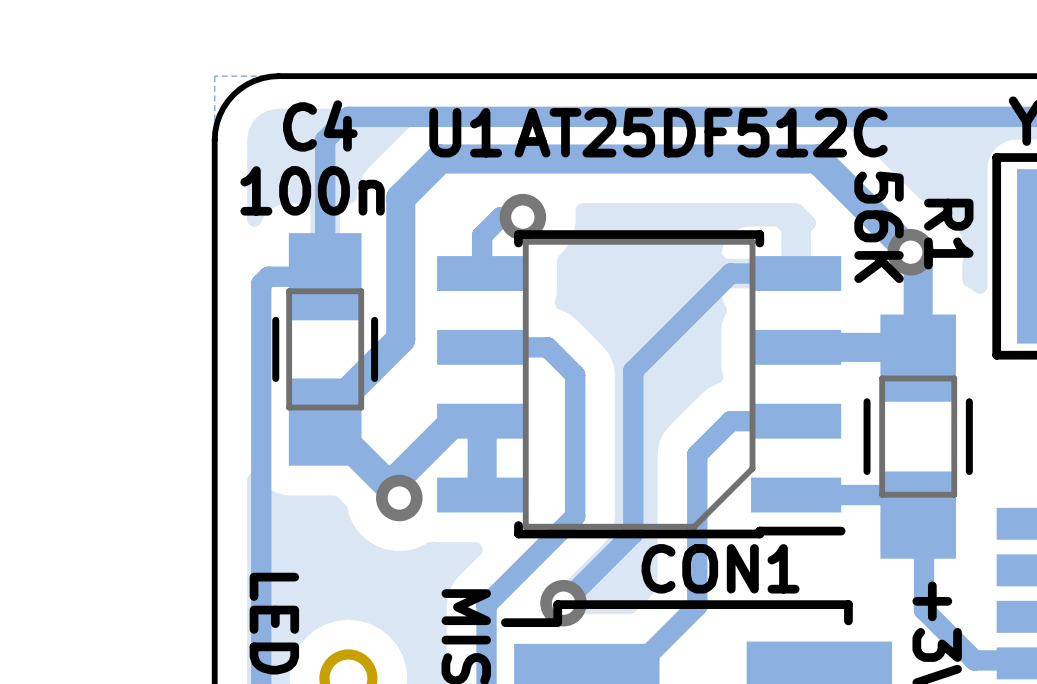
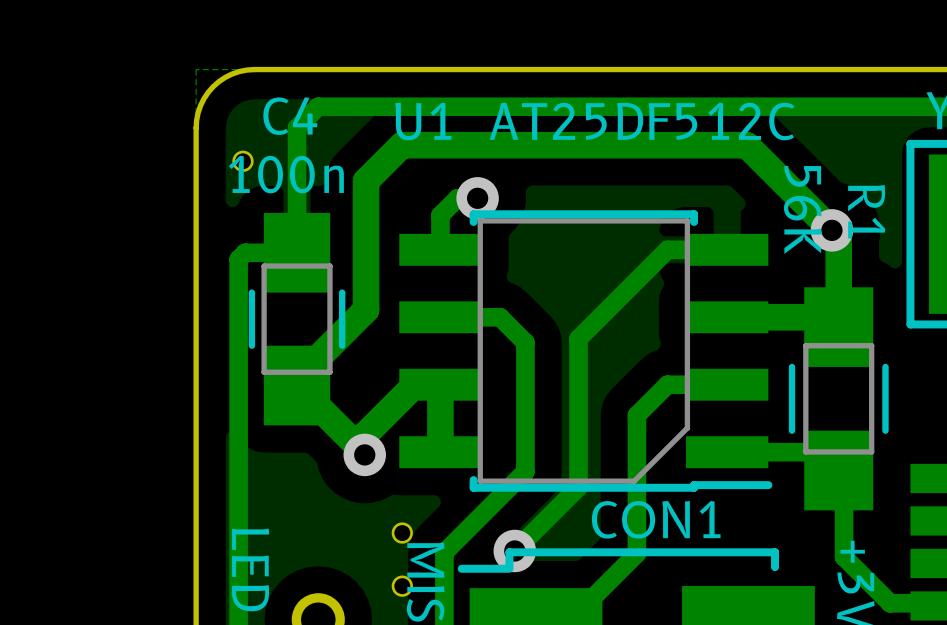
part: none -> (243, 161)
part: none -> (402, 533)
part: none -> (402, 586)

